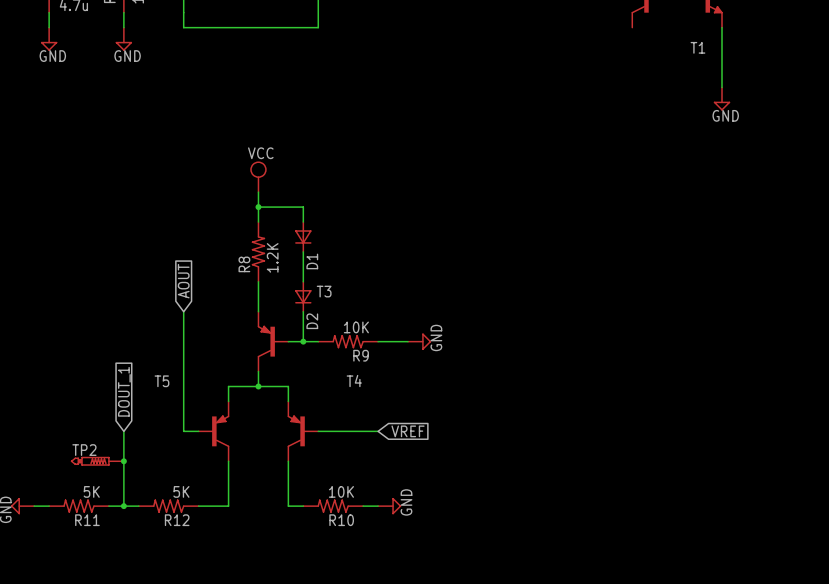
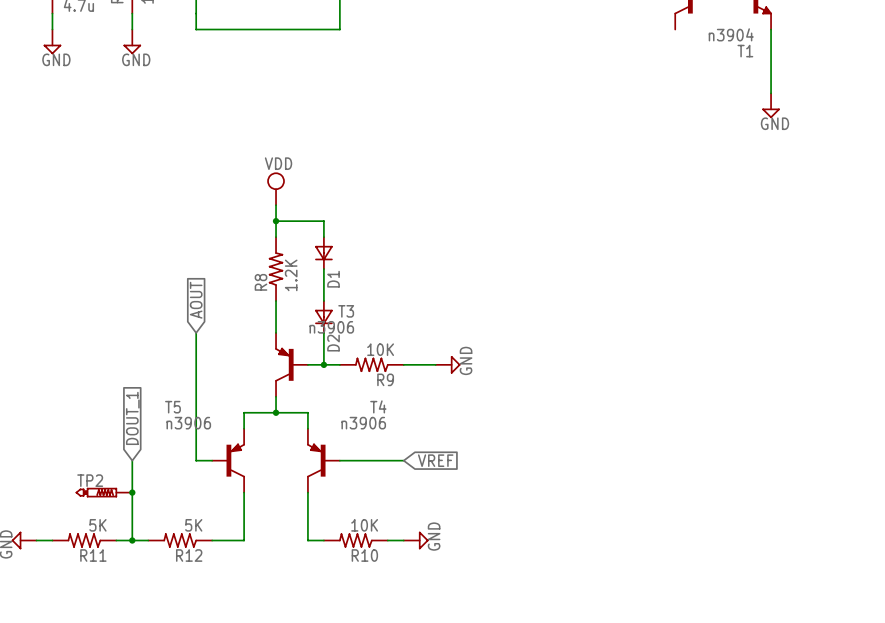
T1 value: none -> n3904 (731, 34)
power symbol: VCC (258, 176) -> VDD (276, 188)
T3 value: none -> n3906 (331, 327)
T5 value: none -> n3906 (188, 423)
T4 value: none -> n3906 (363, 423)

